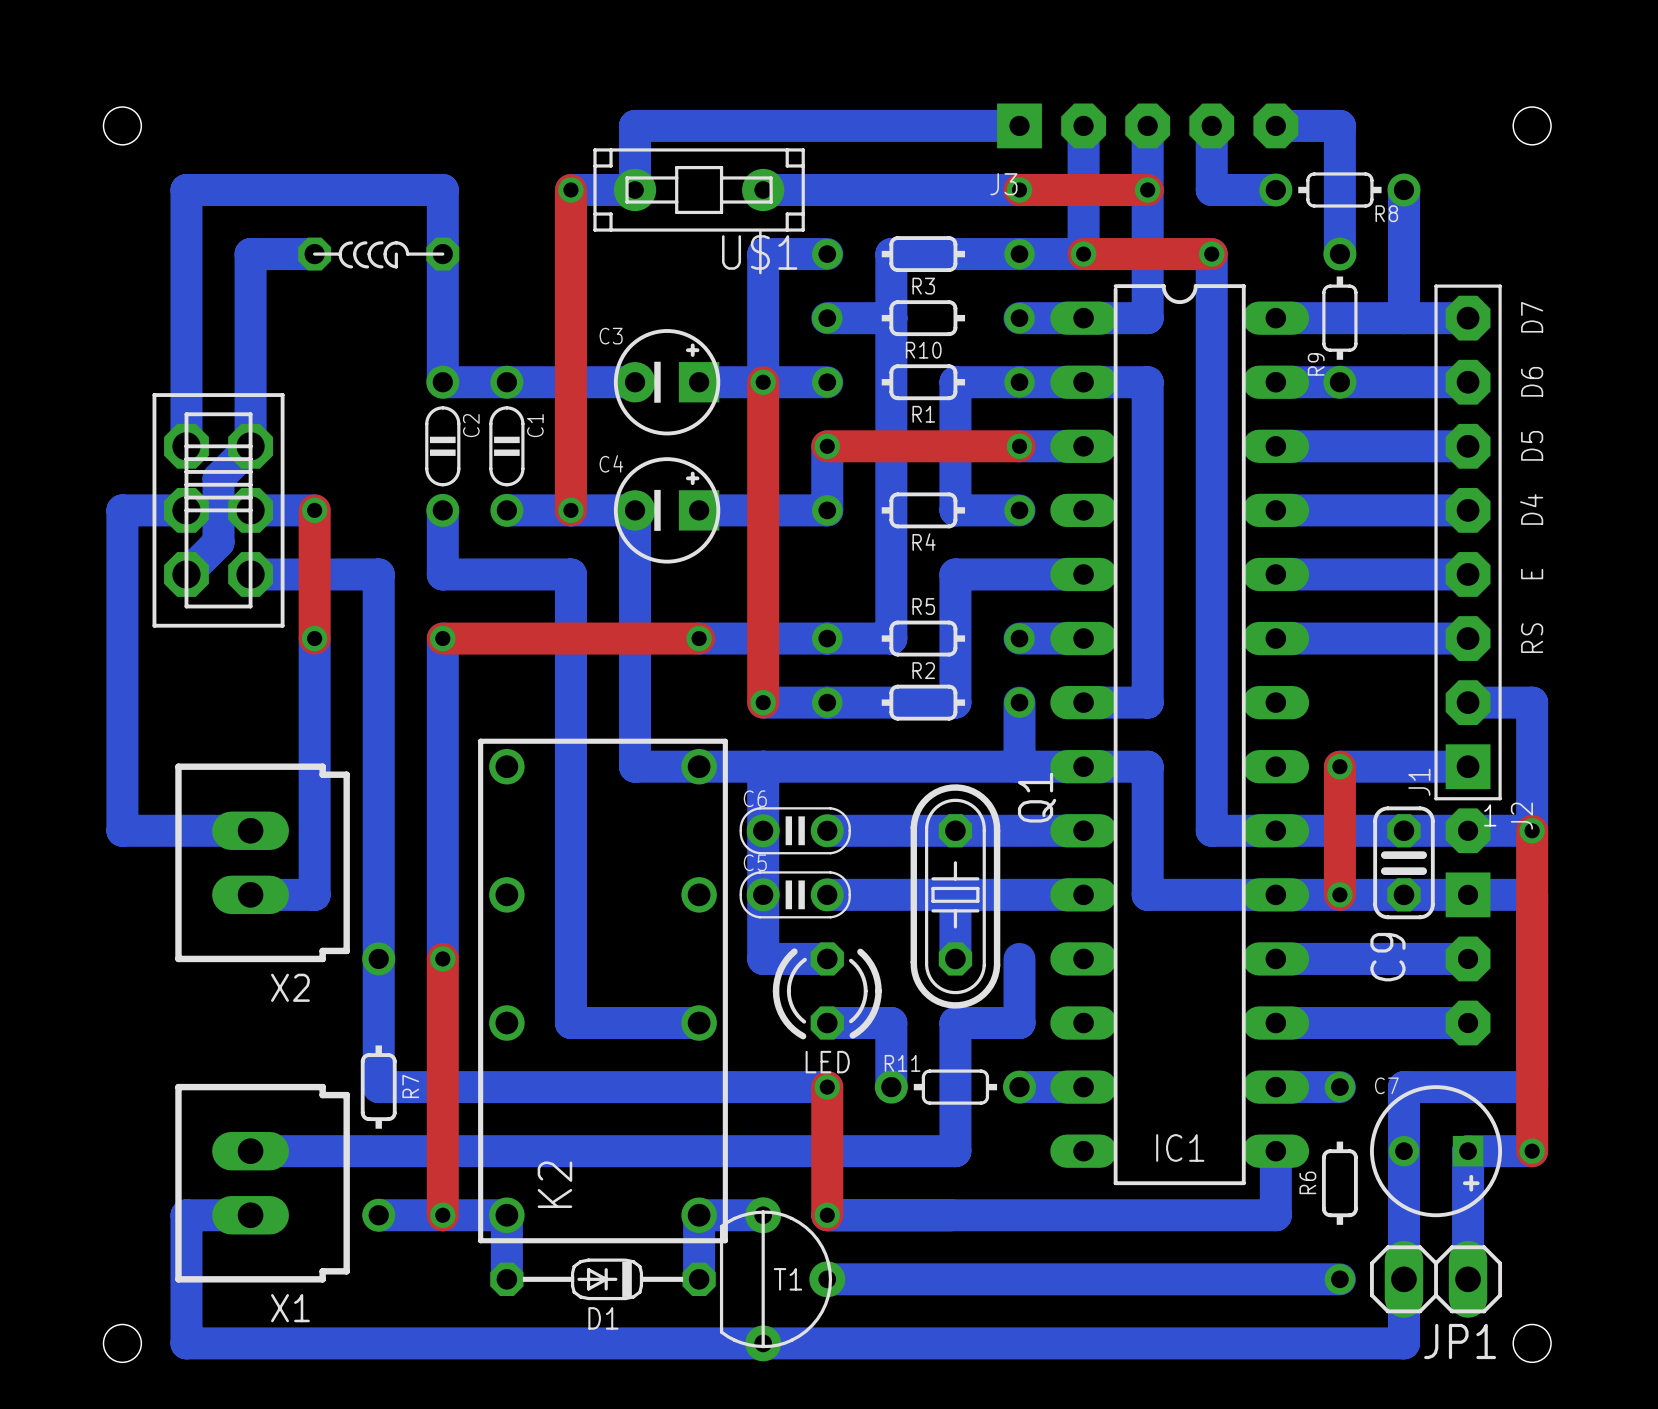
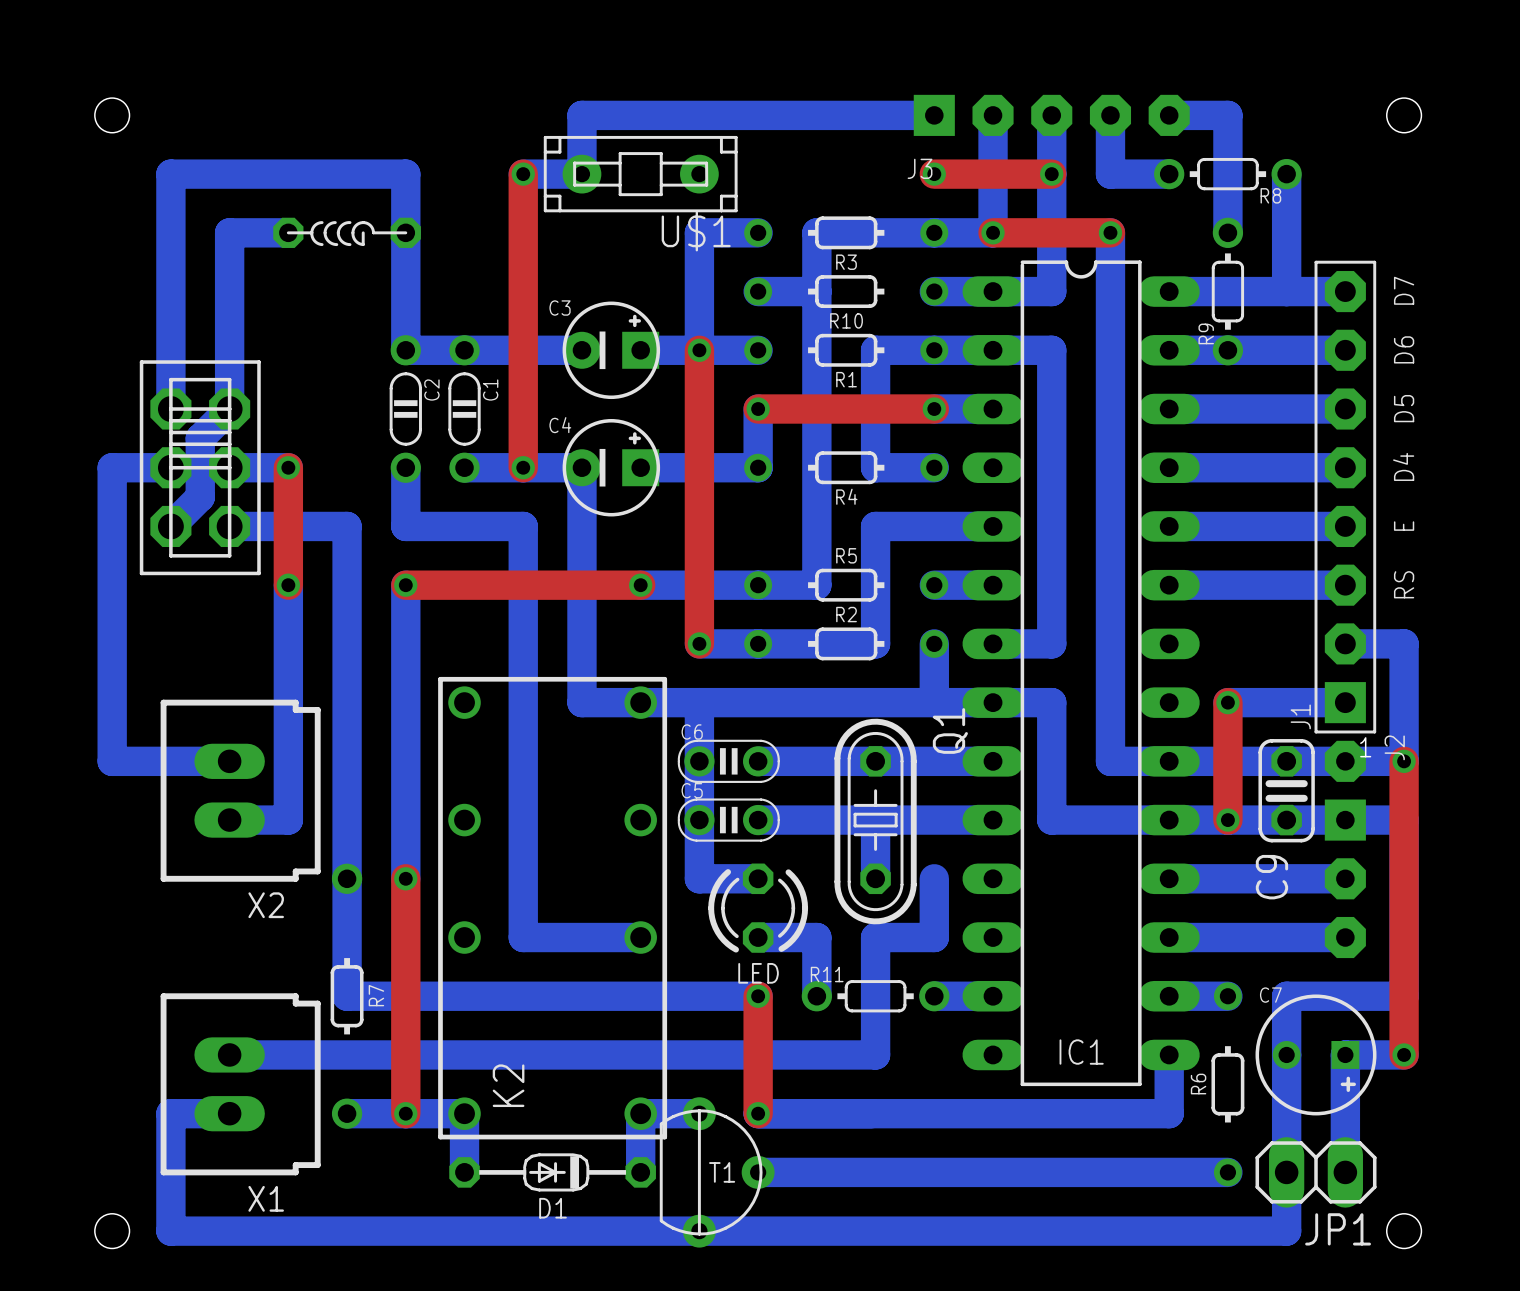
bottom track: (763, 190) (1019, 190) -> none

